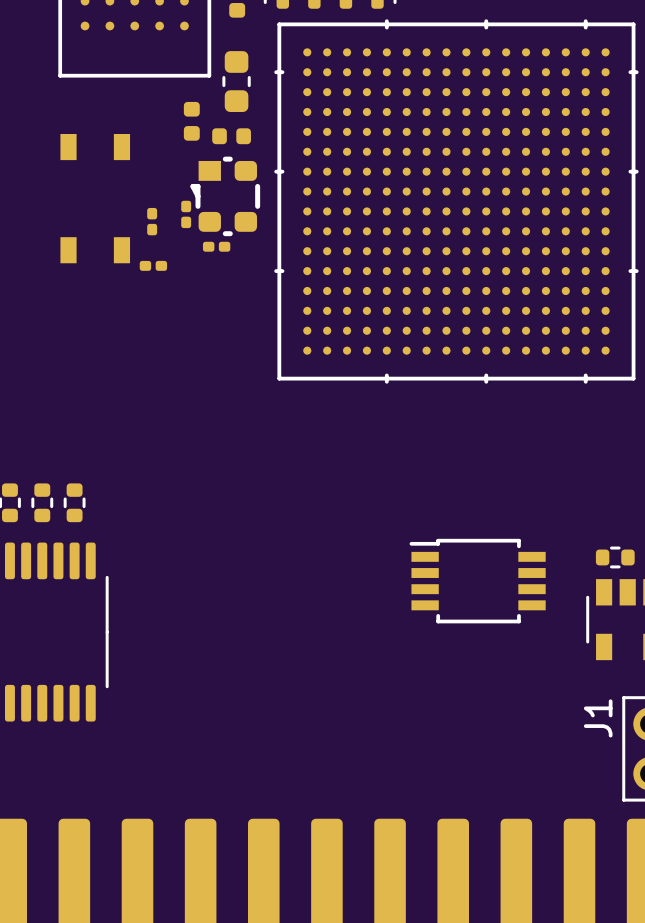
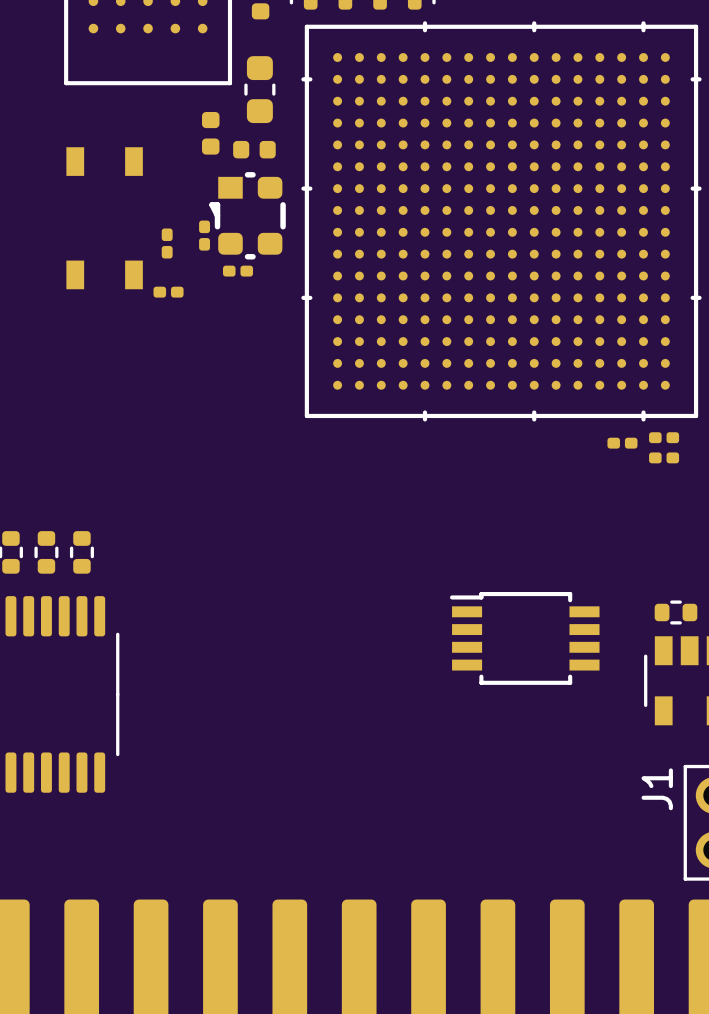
part: none -> (664, 437)
part: none -> (622, 443)
part: none -> (664, 457)

